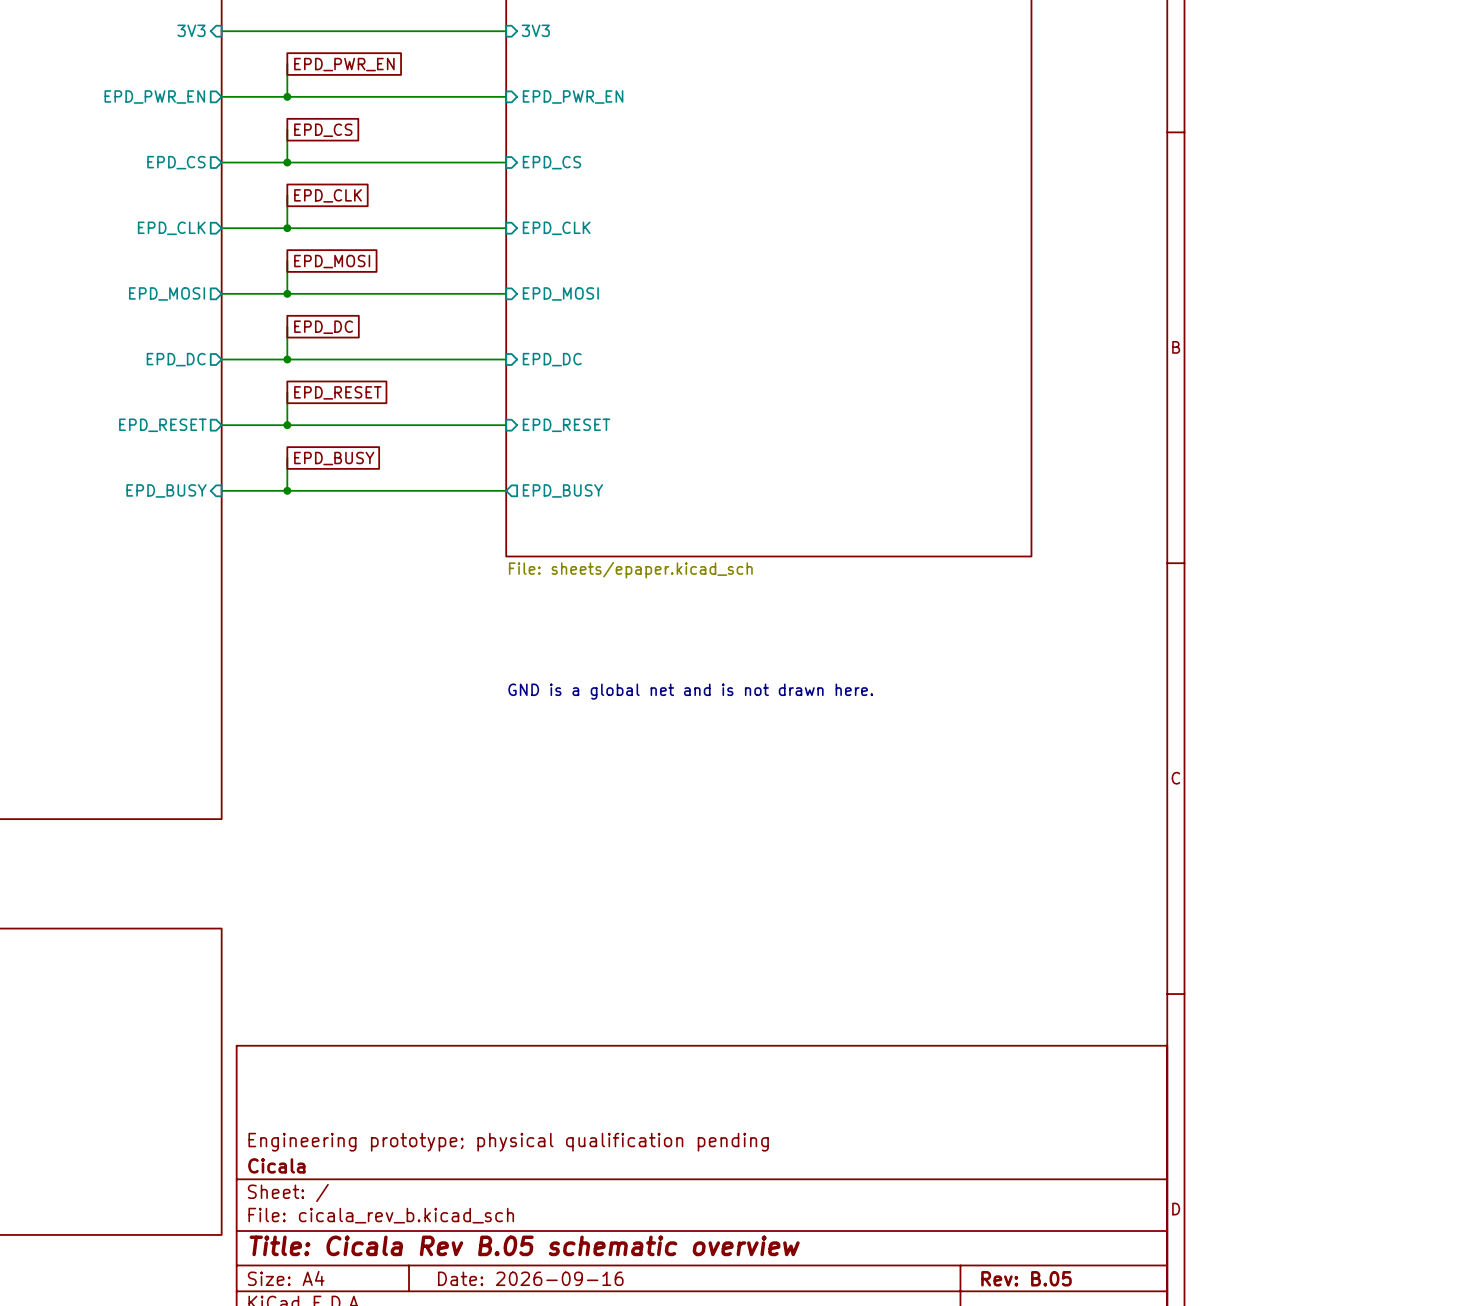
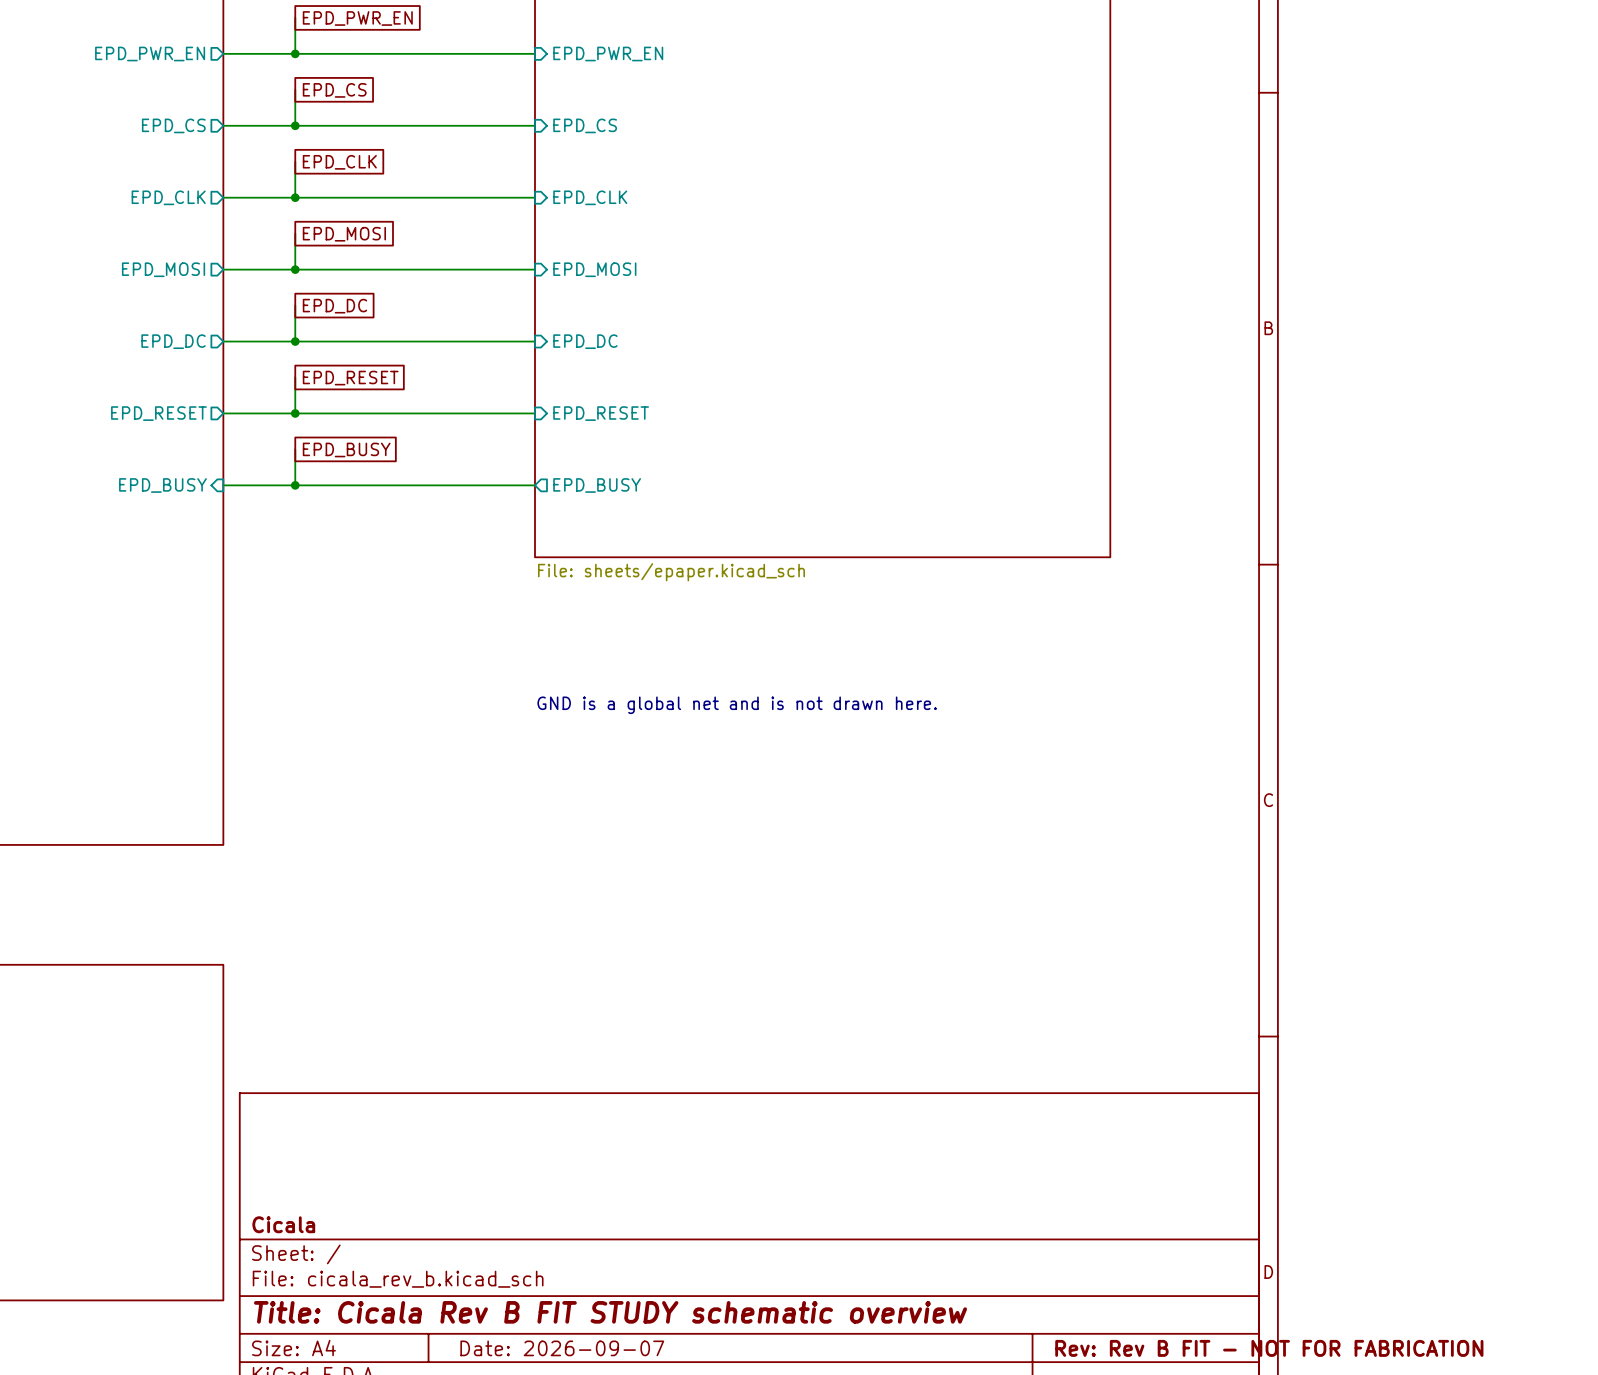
title block: Engineering prototype; physical qualification pending (508, 1142) -> none
title block: Title: Cicala Rev B.05 schematic overview (524, 1245) -> Title: Cicala Rev B FIT STUDY schematic overview (610, 1312)
title block: Date: 2026-09-16 (530, 1278) -> Date: 2026-09-07 (562, 1348)
title block: Rev: B.05 (1026, 1278) -> Rev: Rev B FIT - NOT FOR FABRICATION (1269, 1348)

